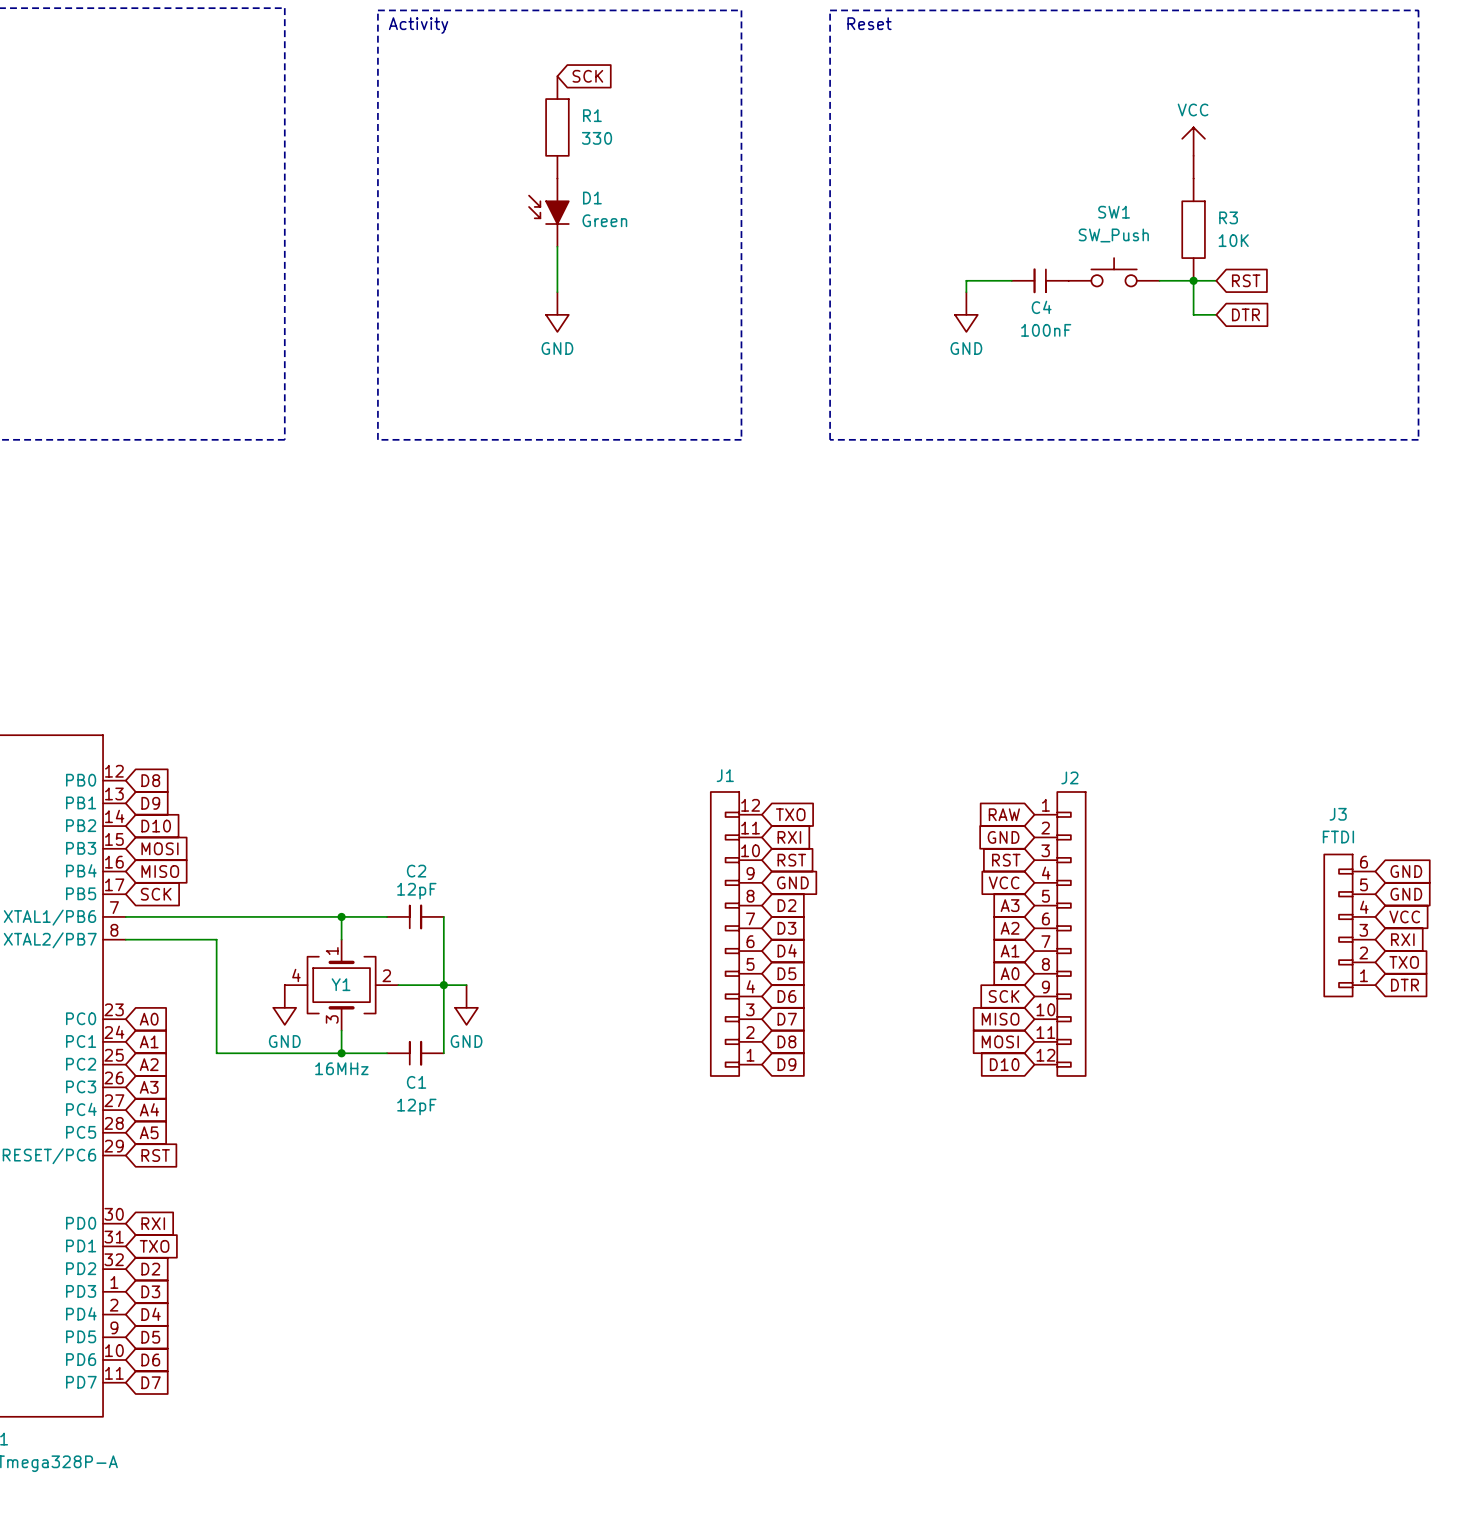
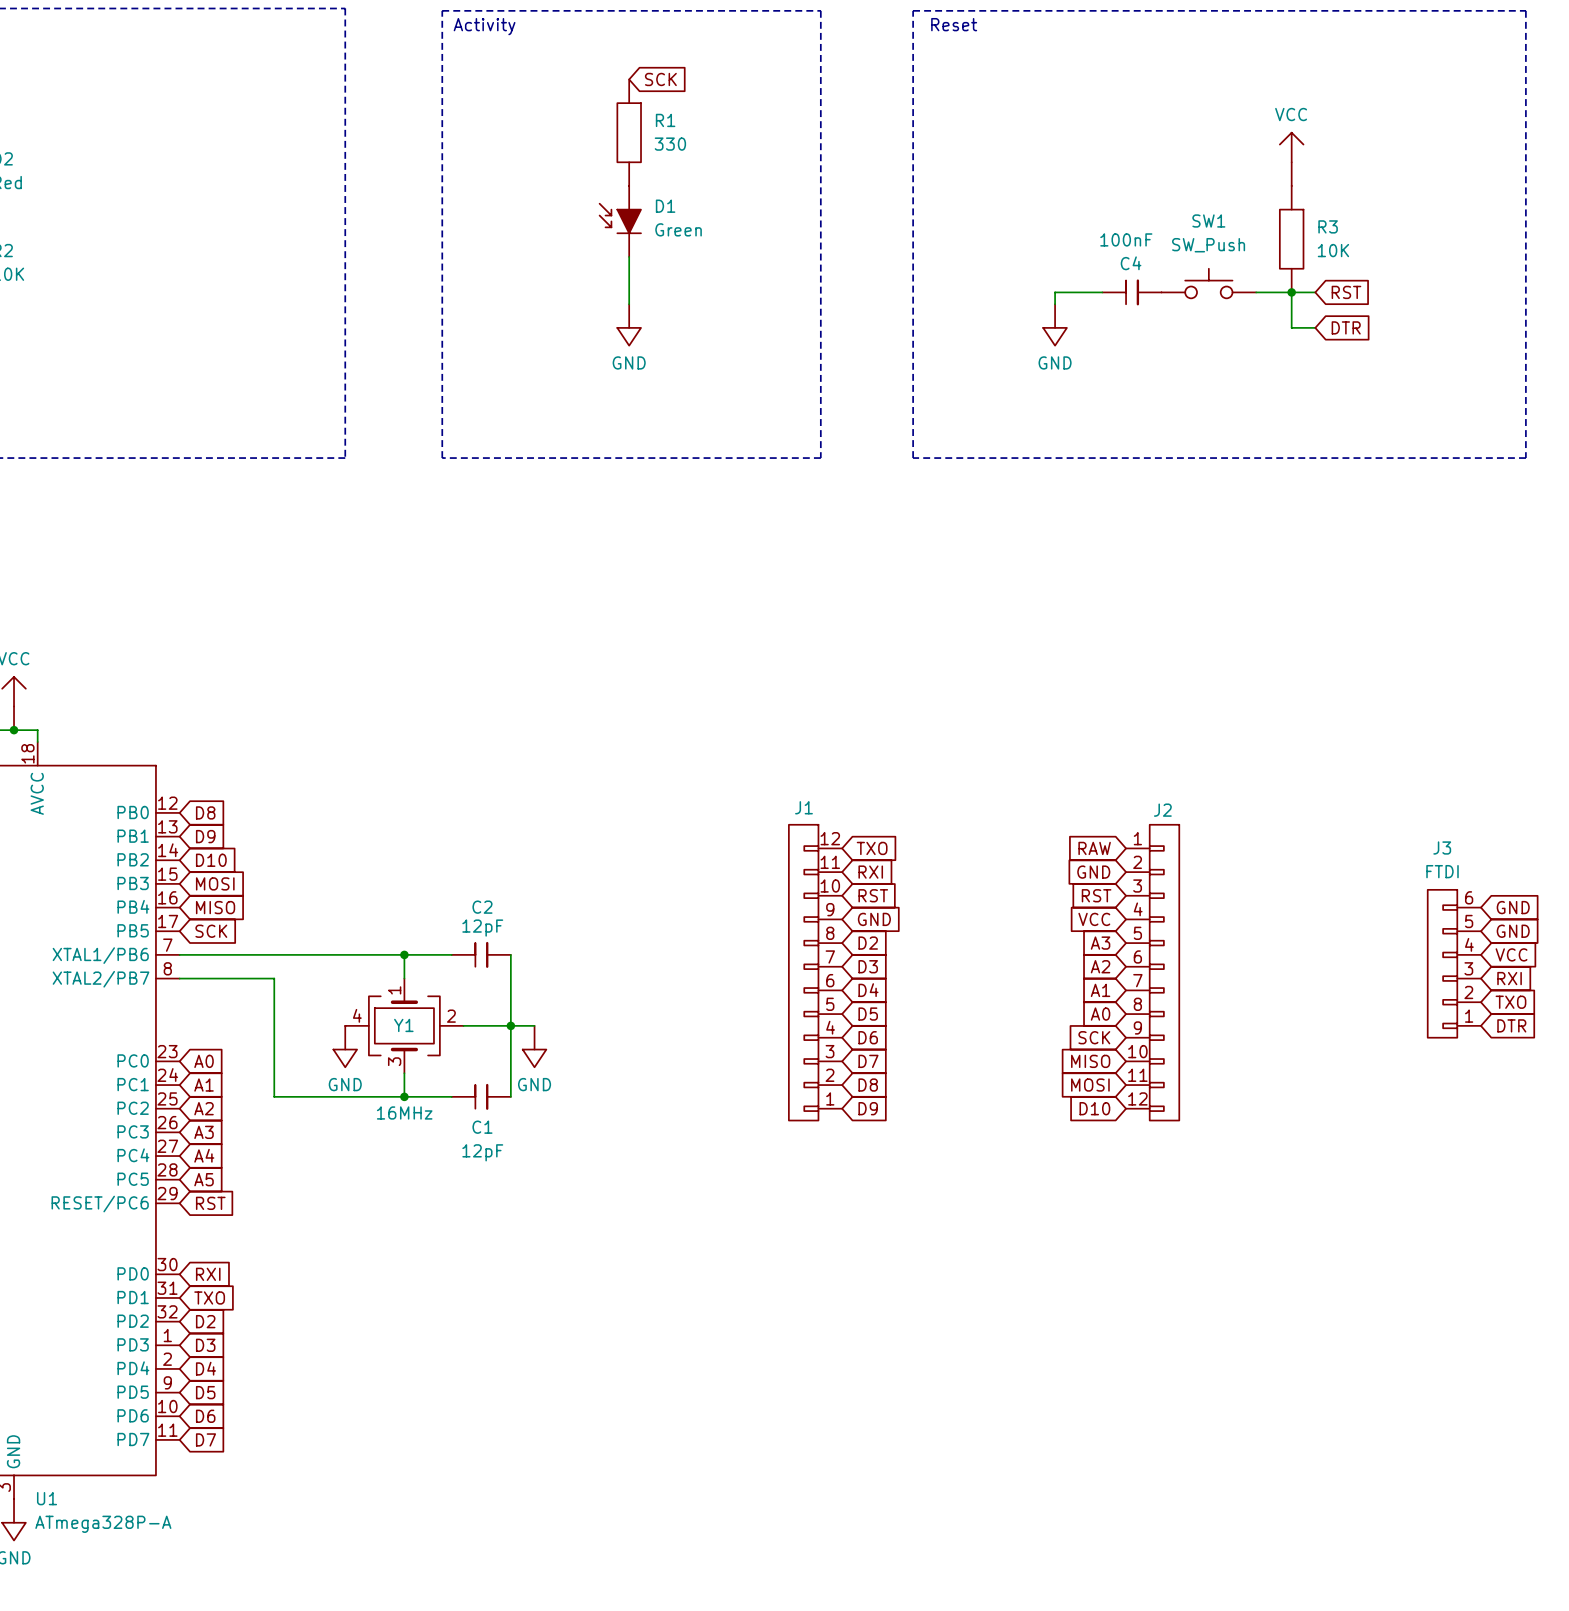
C4 rotation: 0° (1045, 291) -> 180° (1126, 281)

